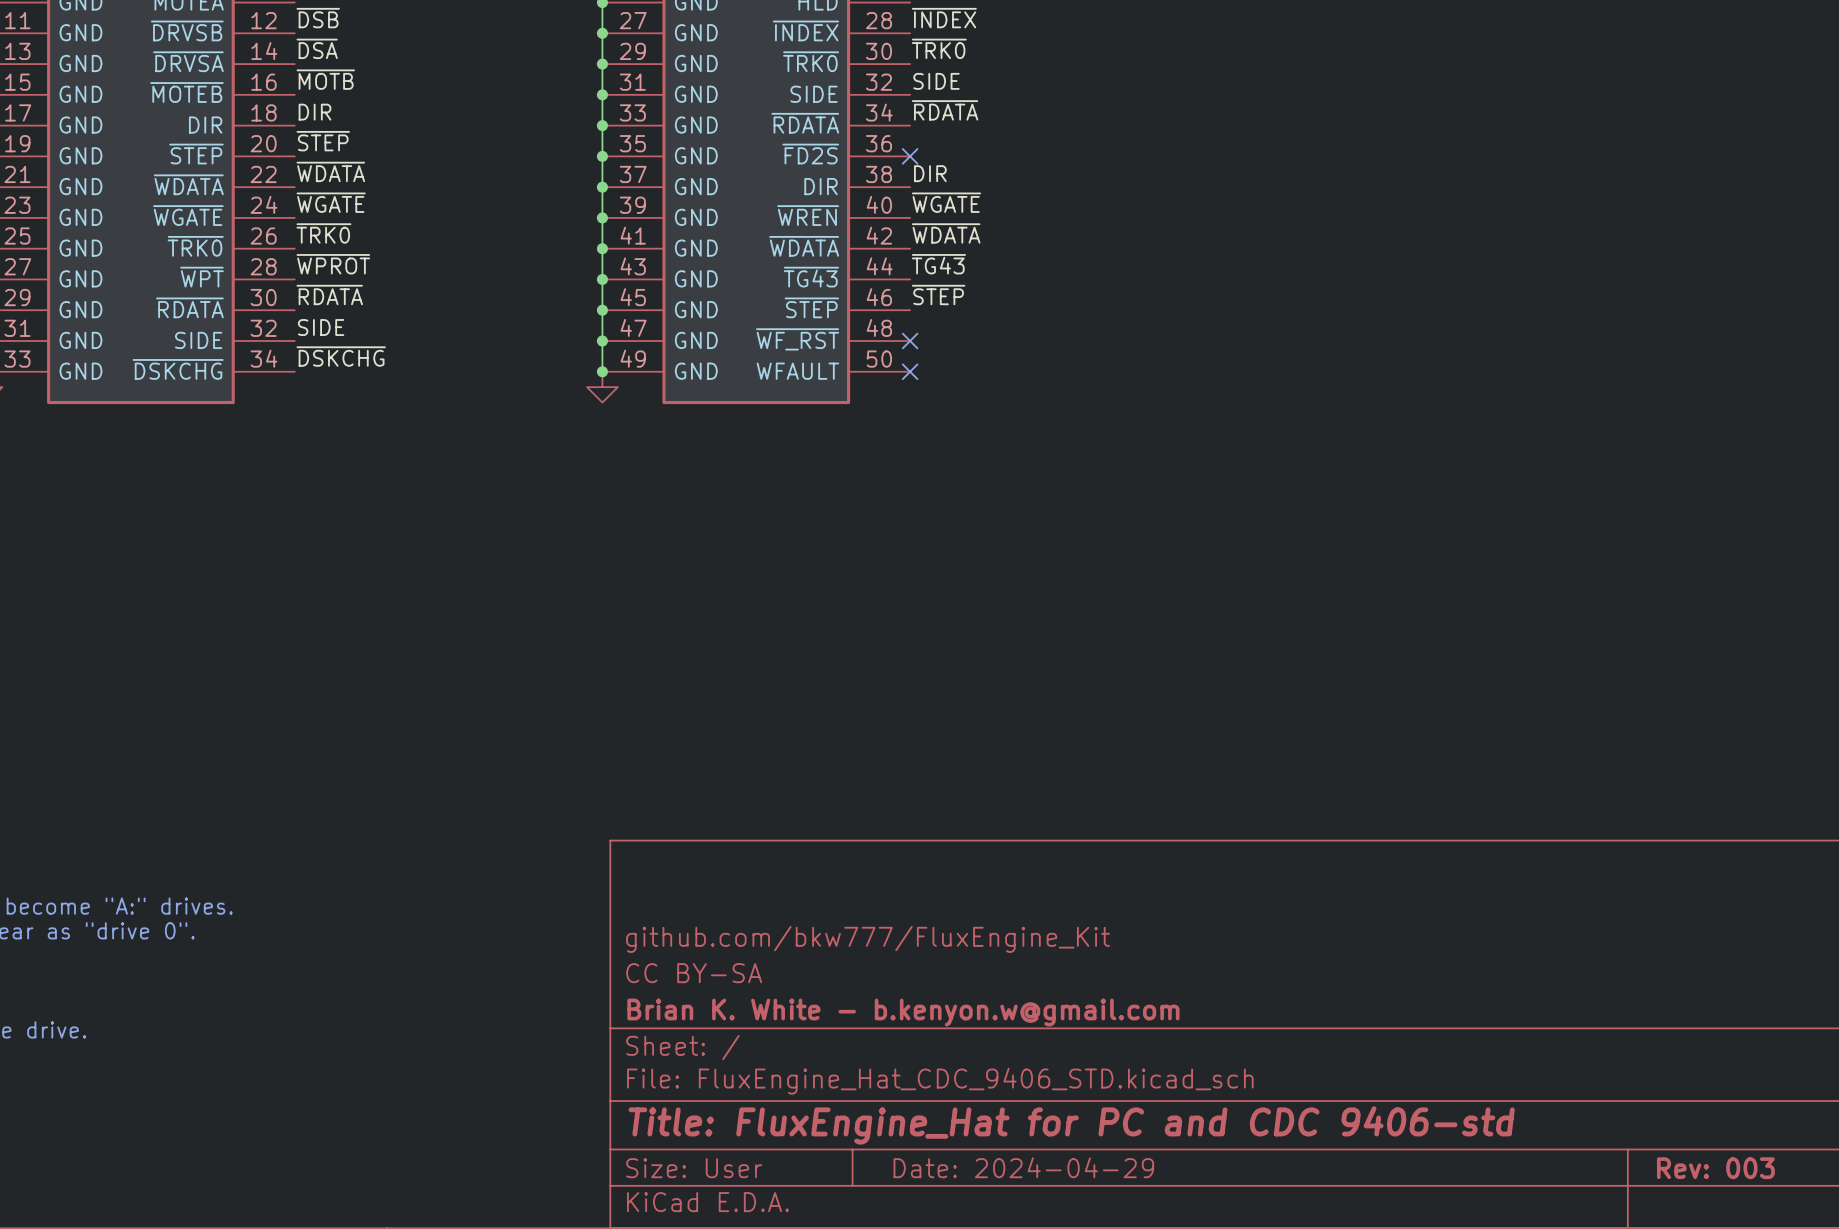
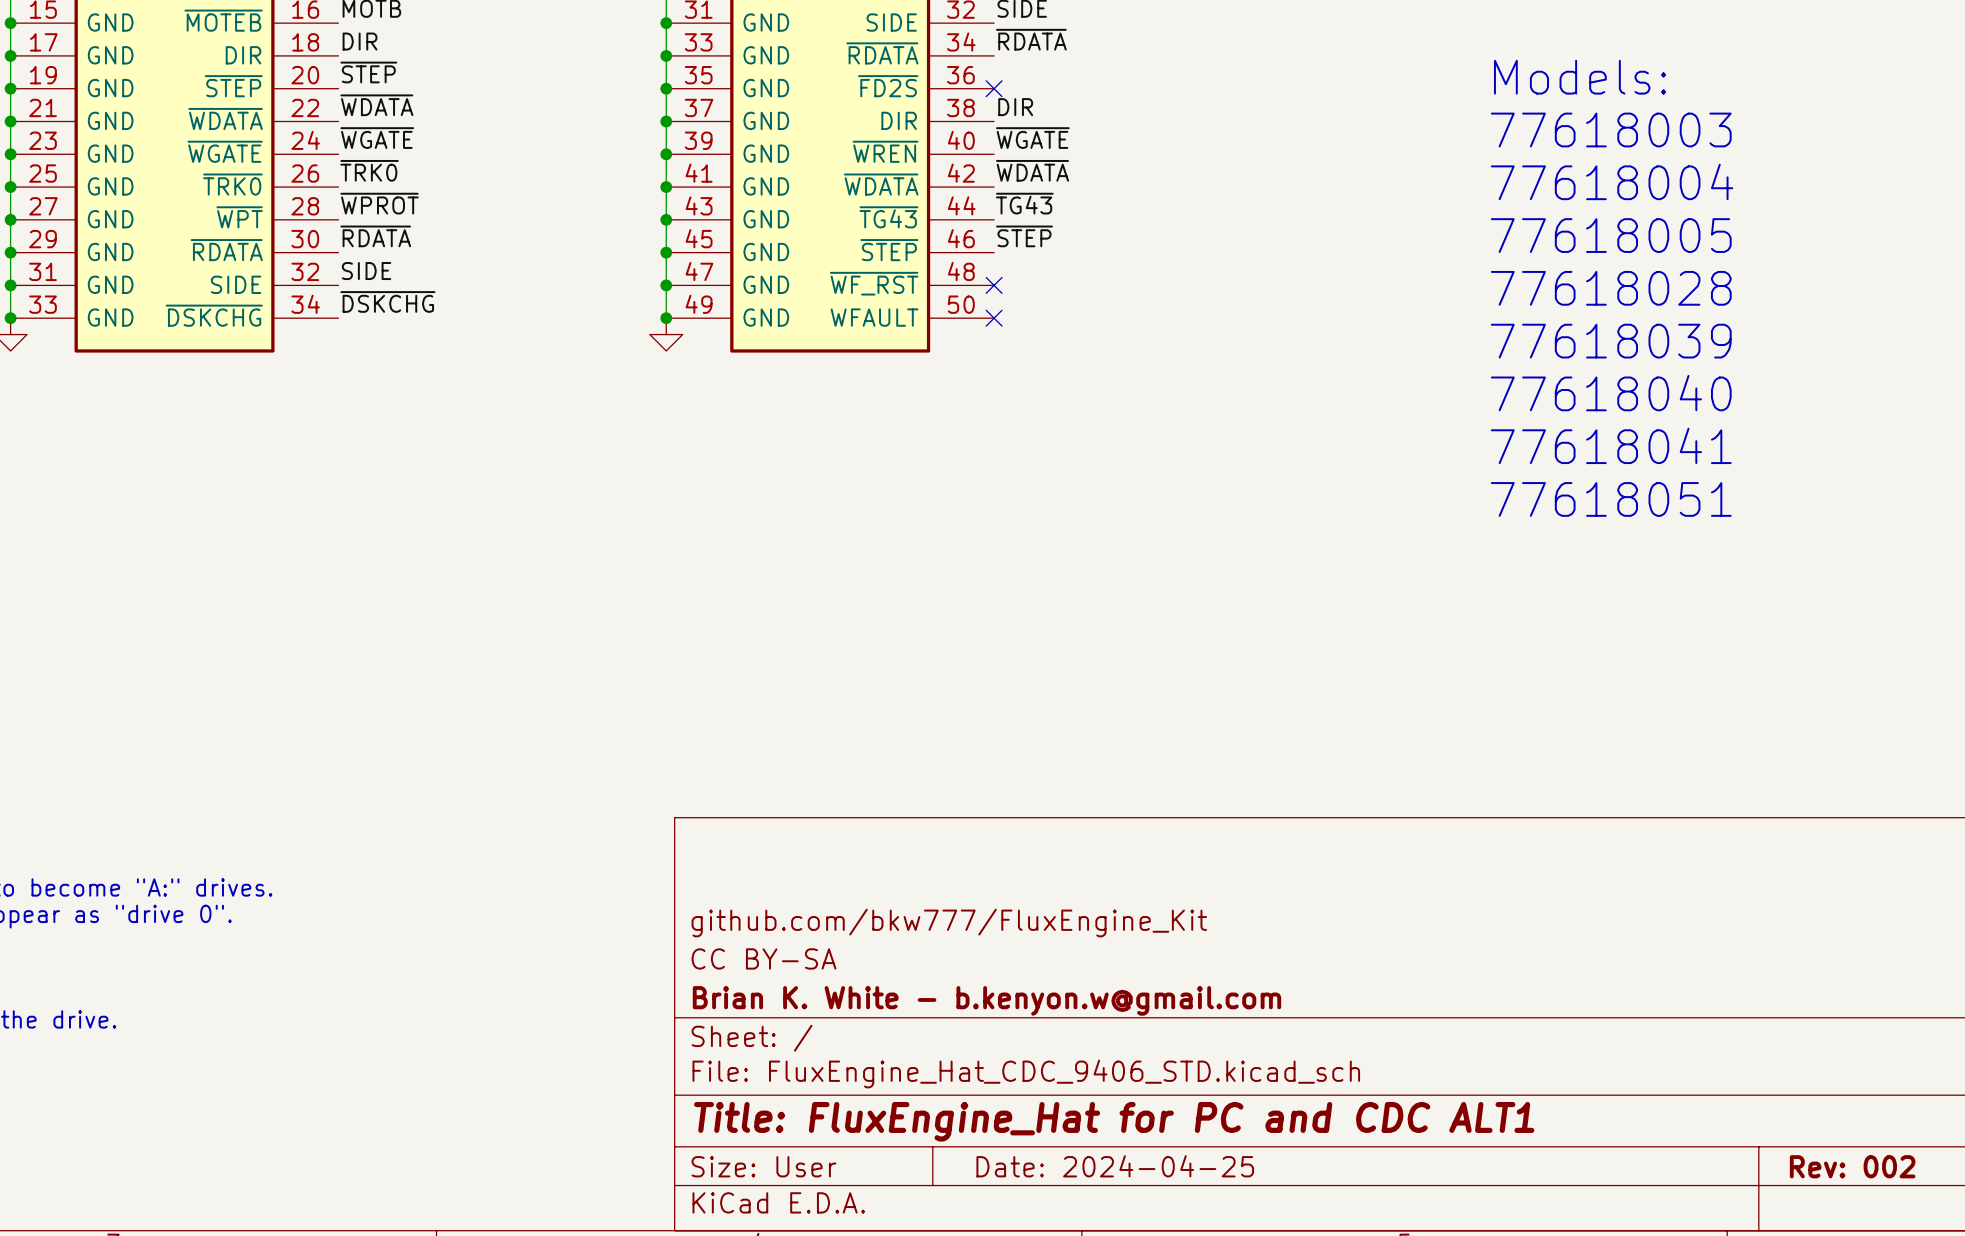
text: none -> Models: (1580, 77)
text: none -> 77618003 (1611, 129)
text: none -> 77618004 (1612, 181)
text: none -> 77618005 (1611, 235)
text: none -> 77618028 (1611, 288)
text: none -> 77618039 (1611, 341)
text: none -> 77618040 (1611, 393)
text: none -> 77618041 (1611, 445)
text: none -> 77618051 (1611, 499)
title block: Title: FluxEngine_Hat for PC and CDC 9406-std (1071, 1125) -> Title: FluxEngine_Hat for PC and CDC ALT1 (1114, 1121)
title block: Date: 2024-04-29 (1023, 1167) -> Date: 2024-04-25 (1115, 1166)
title block: Rev: 003 (1715, 1168) -> Rev: 002 (1852, 1166)

